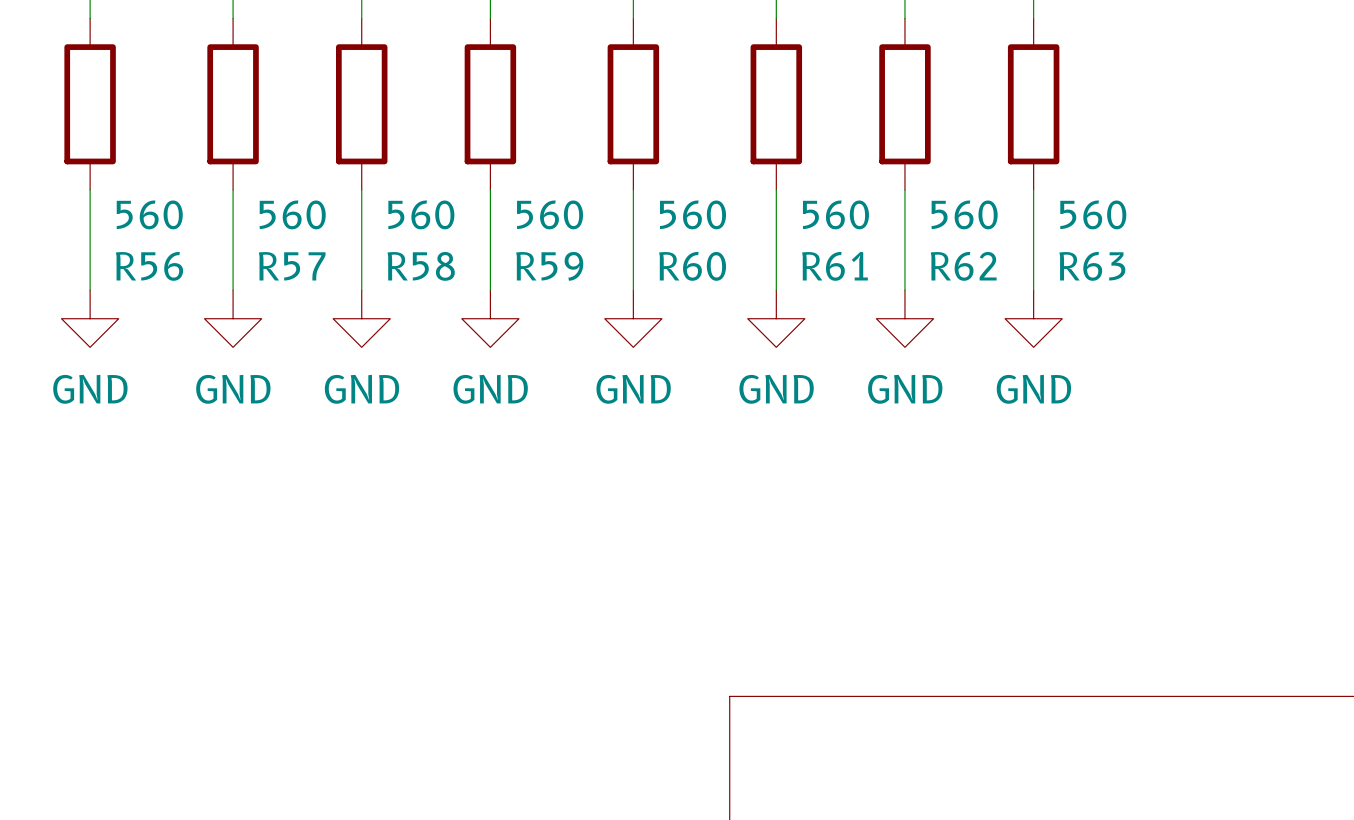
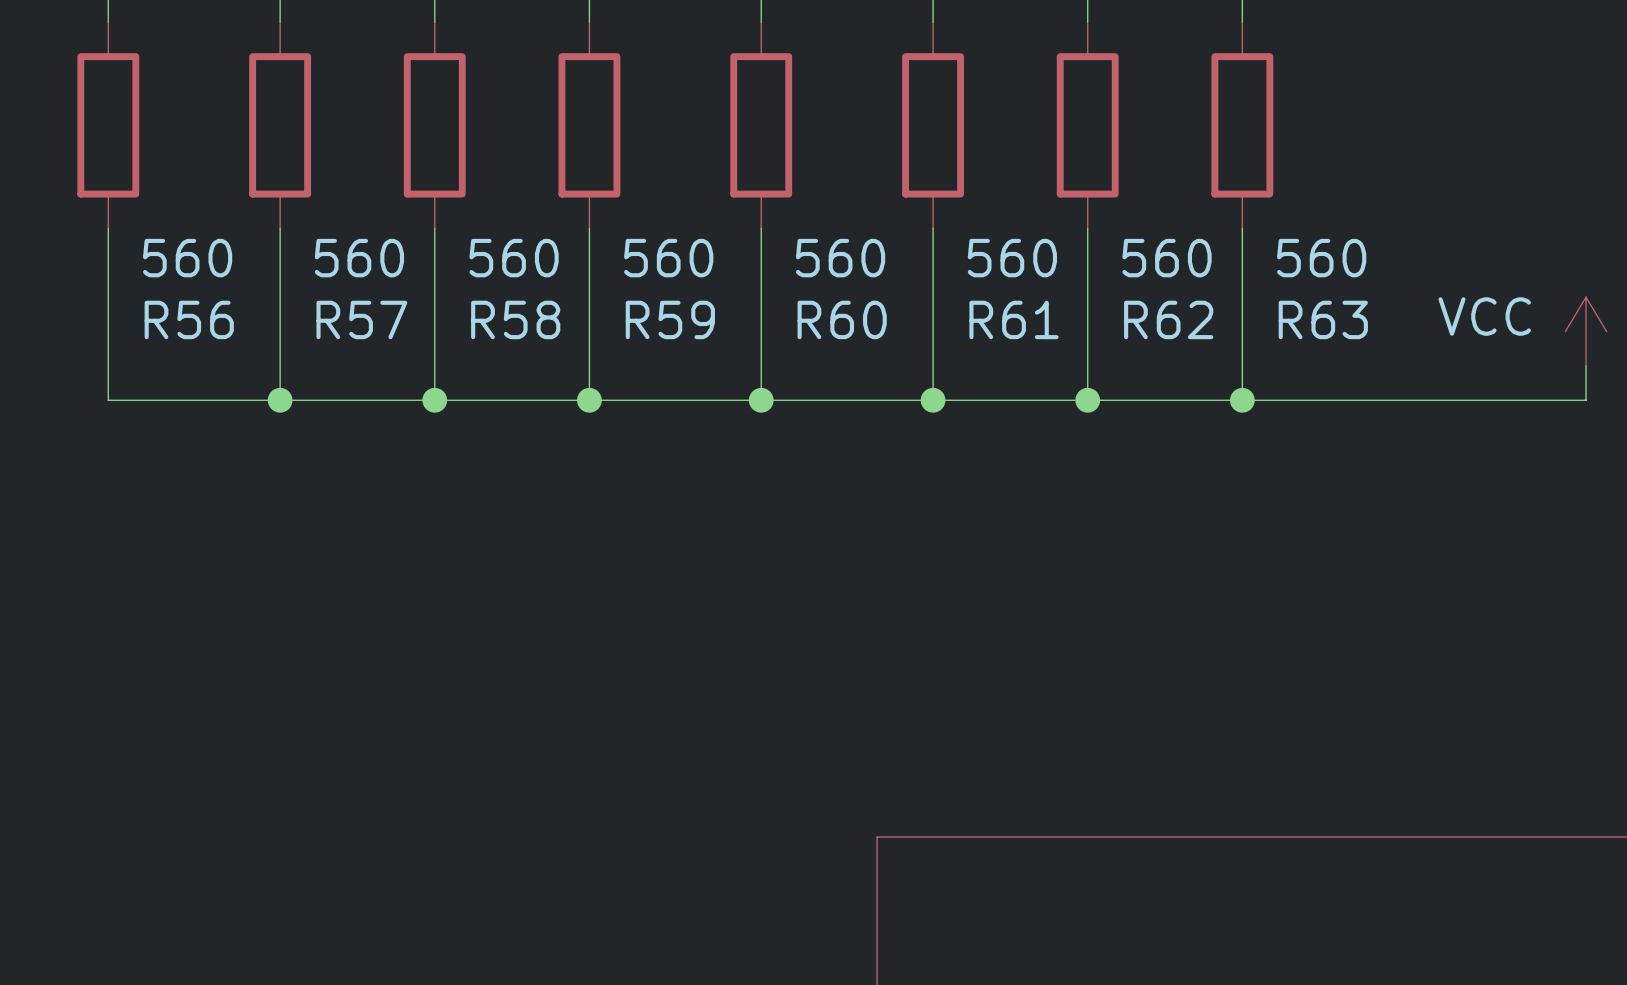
power symbol: none -> VCC (1586, 331)
wire: none -> (108, 348) (108, 400) (1586, 400) (1586, 365)
power symbol: GND (90, 318) -> none
power symbol: GND (233, 318) -> none
power symbol: GND (361, 318) -> none
power symbol: GND (490, 318) -> none
power symbol: GND (633, 318) -> none
power symbol: GND (776, 318) -> none
power symbol: GND (904, 318) -> none
power symbol: GND (1033, 318) -> none
junction: none -> (280, 400)
junction: none -> (434, 400)
junction: none -> (589, 400)
junction: none -> (761, 400)
junction: none -> (933, 400)
junction: none -> (1087, 400)
junction: none -> (1242, 400)

